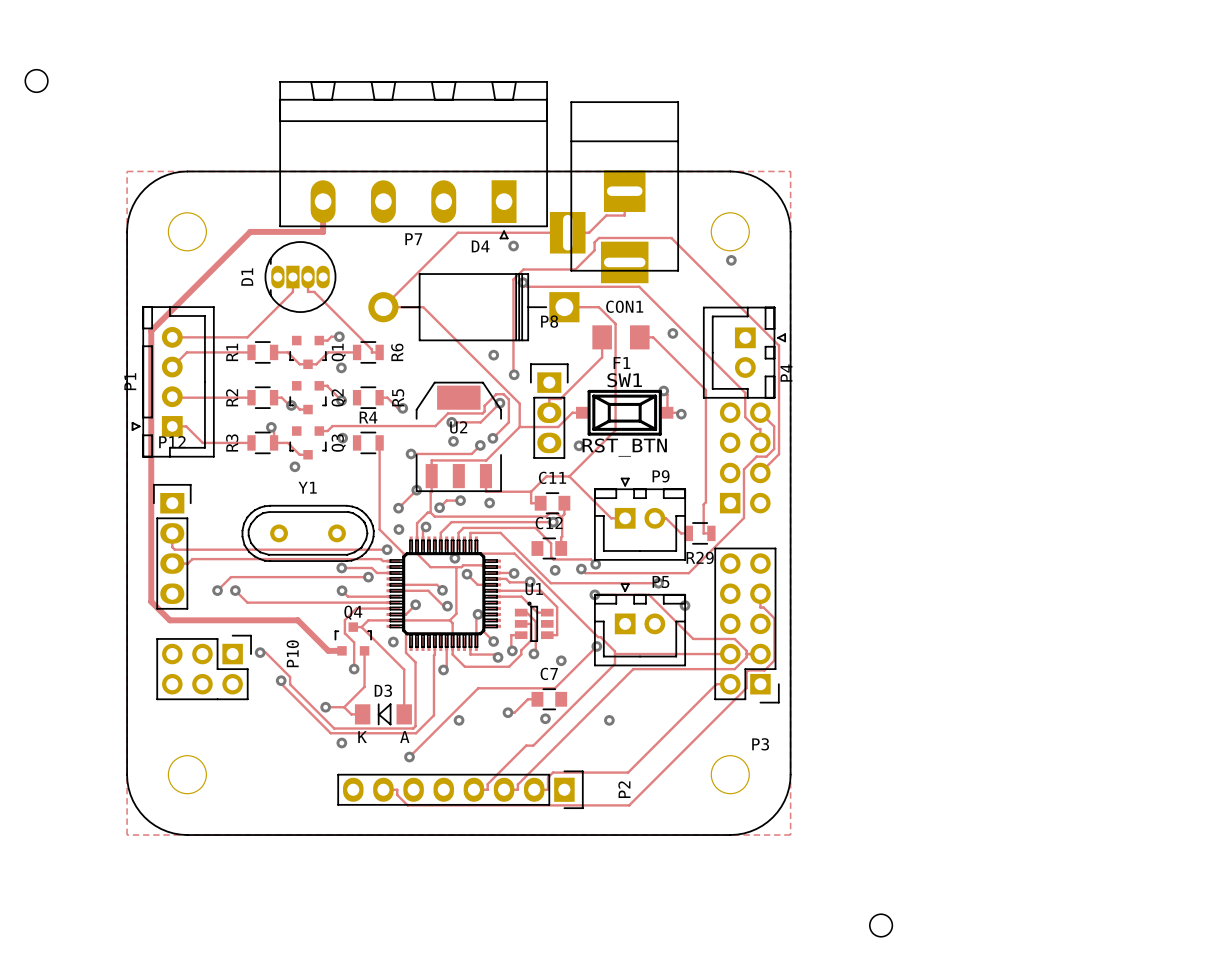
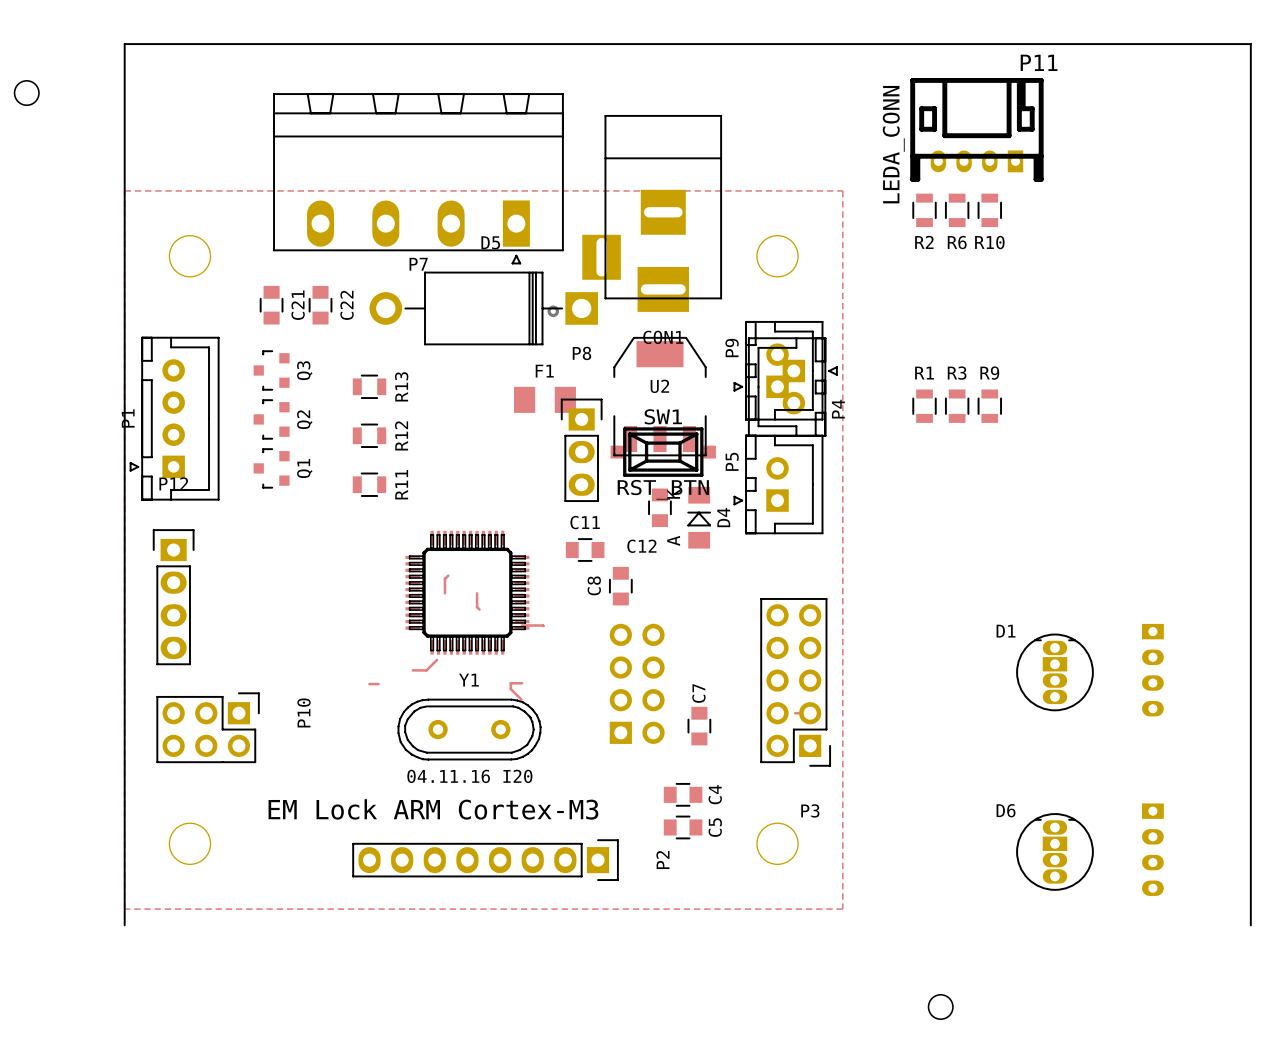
P11: none -> LEDA_CONN (976, 129)
P7 position: (413, 160) -> (418, 178)
R10: none -> (989, 210)
track: (624, 191) (624, 215) (606, 215) (589, 232) (457, 232) (383, 307) (423, 307) (519, 403) (519, 427) -> none
track: (323, 201) (323, 231) (250, 231) (151, 330) (151, 601) (169, 620) (297, 620) (328, 650) (341, 650) -> none
board edge: (127, 231) (130, 211) (140, 194) (149, 184) (161, 177) (180, 171) (730, 171) (750, 174) (767, 184) (777, 194) (784, 205) (789, 218) (790, 231) (790, 774) (787, 794) (781, 806) (772, 817) (756, 829) (743, 833) (730, 835) (180, 834) (167, 831) (155, 825) (140, 812) (130, 794) (127, 774) -> (124, 925) (124, 843)
board edge: none -> (124, 256) (124, 44) (1250, 44) (1250, 925)
D4 name position: D4 (480, 246) -> D4 (723, 517)
via: (513, 246) -> none
via: (731, 260) -> none
D4 footprint: [368, 273, 580, 342] -> [687, 486, 712, 549]
D1 name position: D1 (247, 277) -> D1 (1006, 631)
C21: none -> (271, 305)
track: (292, 277) (292, 291) (247, 337) (172, 337) -> none
D1 rotation: 0° (300, 277) -> 90° clockwise (1054, 672)
D1 position: (300, 277) -> (1054, 672)
track: (308, 277) (308, 291) (314, 291) (371, 349) (371, 352) (379, 352) -> none
C22: none -> (320, 305)
D5: none -> (483, 308)
track: (523, 282) (527, 286) (639, 286) (745, 392) (745, 417) (757, 428) (760, 428) (760, 442) -> none
track: (564, 307) (598, 307) (615, 323) (615, 430) (569, 476) -> none
via: (672, 333) -> none
track: (339, 336) (331, 336) (327, 340) (319, 340) -> none
via: (339, 336) -> none
track: (602, 337) (602, 357) (560, 398) (549, 398) (549, 412) -> none
F1 position: (620, 337) -> (544, 399)
track: (639, 337) (653, 337) (705, 390) (705, 502) (703, 504) (703, 533) (711, 533) -> none
track: (251, 352) (186, 352) (172, 367) -> none
R1 rotation: 0° (262, 352) -> 90° clockwise (924, 406)
R1 position: (262, 352) -> (924, 406)
track: (274, 352) (287, 352) (299, 364) (316, 364) (328, 352) (357, 352) -> none
Q1 rotation: 0° (308, 352) -> 90° clockwise (271, 468)
Q1 position: (308, 352) -> (271, 468)
R13: none -> (369, 386)
R6 rotation: 0° (368, 352) -> 90° clockwise (957, 210)
R6 position: (368, 352) -> (957, 210)
via: (493, 355) -> none
F1 name position: F1 (621, 363) -> F1 (544, 371)
via: (341, 367) -> none
R9: none -> (989, 406)
track: (514, 374) (513, 279) (523, 269) (575, 269) (594, 250) (594, 242) (599, 237) (671, 237) (779, 345) (779, 454) (760, 472) -> none
via: (514, 374) -> none
track: (319, 385) (327, 385) (341, 400) -> none
track: (663, 391) (667, 394) (667, 412) (681, 414) -> none
via: (663, 391) -> none
track: (172, 396) (251, 397) -> none
R2 name position: R2 (232, 397) -> R2 (924, 242)
R2 rotation: 0° (262, 397) -> 90° clockwise (924, 210)
R2 position: (262, 397) -> (924, 210)
track: (274, 397) (281, 397) (289, 405) (295, 405) (299, 409) (308, 409) -> none
Q2 rotation: 0° (308, 397) -> 90° clockwise (271, 419)
Q2 position: (308, 397) -> (271, 419)
R12: none -> (369, 435)
R5: (368, 397) -> none
track: (379, 397) (387, 397) (398, 408) (402, 408) -> none
via: (341, 400) -> none
track: (499, 403) (480, 422) (451, 422) -> none
via: (499, 403) -> none
via: (291, 405) -> none
via: (402, 408) -> none
track: (581, 412) (572, 412) (558, 427) (519, 427) -> none
track: (760, 412) (774, 426) (774, 448) (766, 456) (756, 456) (743, 469) (743, 518) (688, 573) (585, 573) (581, 569) -> none
via: (681, 414) -> none
via: (451, 422) -> none
track: (172, 426) (186, 426) (202, 442) (251, 442) -> none
track: (271, 427) (274, 430) (274, 442) (287, 442) (299, 454) (308, 454) -> none
via: (271, 427) -> none
track: (519, 427) (486, 460) (431, 460) (430, 512) -> none
track: (319, 431) (327, 431) (332, 426) (435, 426) (448, 413) (482, 413) (484, 405) (496, 394) (503, 394) (508, 399) (508, 422) (492, 438) -> none
U2 position: (458, 436) -> (660, 396)
via: (342, 438) -> none
via: (492, 438) -> none
via: (453, 441) -> none
R3 rotation: 0° (262, 442) -> 90° clockwise (957, 406)
R3 position: (262, 442) -> (957, 406)
Q3 rotation: 0° (308, 442) -> 90° clockwise (271, 370)
Q3 position: (308, 442) -> (271, 370)
R11: none -> (369, 484)
R4: (368, 442) -> none
track: (379, 442) (379, 529) (403, 553) (403, 584) -> none
track: (480, 445) (471, 453) (411, 453) -> none
via: (480, 445) -> none
via: (579, 445) -> none
via: (411, 453) -> none
part position: (745, 457) -> (637, 683)
via: (294, 466) -> none
track: (485, 476) (485, 491) (531, 491) -> none
track: (569, 476) (611, 518) (625, 518) -> none
track: (569, 476) (546, 476) (531, 491) -> none
track: (416, 490) (398, 508) -> none
via: (416, 490) -> none
track: (531, 491) (531, 503) (540, 503) -> none
track: (460, 500) (446, 500) (439, 507) -> none
via: (460, 500) -> none
via: (489, 502) -> none
track: (564, 503) (564, 514) (561, 517) -> none
via: (439, 507) -> none
via: (398, 508) -> none
track: (430, 512) (427, 512) (417, 523) (417, 553) (430, 567) (461, 567) (463, 565) (494, 567) -> none
track: (430, 512) (434, 516) (546, 516) (549, 513) (556, 513) (562, 518) (561, 548) -> none
track: (654, 518) (666, 518) (681, 533) (688, 533) -> none
P9 rotation: 0° (640, 519) -> 90° counterclockwise (778, 370)
P9 position: (640, 519) -> (778, 370)
track: (553, 522) (451, 522) (440, 532) (440, 543) -> none
via: (553, 522) -> none
C12 name position: C12 (549, 523) -> C12 (641, 546)
via: (426, 526) -> none
via: (398, 529) -> none
track: (172, 533) (172, 547) (174, 549) (387, 549) -> none
Y1 position: (308, 533) -> (469, 729)
R29: (700, 533) -> none
C8: none -> (620, 586)
track: (458, 543) (458, 532) (463, 527) (535, 527) (551, 543) (551, 557) (553, 559) (590, 559) (595, 564) -> none
track: (464, 543) (464, 553) (514, 553) (598, 637) (600, 637) (614, 651) (614, 663) (533, 745) (526, 745) (487, 784) (487, 789) (473, 789) -> none
track: (470, 543) (470, 532) (500, 532) (550, 583) (658, 583) -> none
C12 rotation: 0° (549, 548) -> 90° clockwise (659, 507)
C12 position: (549, 548) -> (659, 507)
via: (387, 549) -> none
via: (454, 558) -> none
track: (393, 561) (382, 561) (380, 559) (192, 559) (187, 563) (172, 563) -> none
via: (595, 564) -> none
track: (456, 567) (456, 613) (449, 620) -> none
track: (341, 568) (371, 568) (376, 572) (393, 572) -> none
via: (341, 568) -> none
via: (581, 569) -> none
via: (555, 570) -> none
via: (514, 573) -> none
track: (467, 574) (477, 584) (494, 584) -> none
via: (467, 574) -> none
track: (368, 577) (231, 577) (217, 590) -> none
via: (368, 577) -> none
track: (494, 578) (506, 578) (509, 582) (530, 581) -> none
via: (530, 581) -> none
via: (658, 583) -> none
track: (393, 584) (437, 584) (442, 590) -> none
via: (217, 590) -> none
track: (235, 590) (247, 602) (393, 602) -> none
via: (235, 590) -> none
track: (342, 590) (347, 596) (393, 596) -> none
via: (342, 590) -> none
track: (393, 590) (428, 590) (443, 606) (447, 606) -> none
via: (442, 590) -> none
track: (494, 590) (540, 590) (557, 607) (557, 635) (547, 635) -> none
part position: (443, 593) -> (467, 592)
track: (760, 593) (760, 607) (763, 607) (774, 618) (774, 660) (764, 670) (748, 670) (746, 672) (746, 687) (629, 805) (407, 805) (397, 794) (397, 789) (383, 789) -> none
track: (594, 594) (649, 594) (693, 638) (734, 638) (746, 650) (746, 657) (734, 669) (633, 669) (517, 784) (517, 789) (504, 789) -> none
via: (594, 594) -> none
track: (494, 596) (521, 596) (537, 612) (547, 612) -> none
via: (415, 604) -> none
via: (685, 605) -> none
via: (447, 606) -> none
track: (393, 608) (356, 608) (344, 620) (344, 633) (354, 642) (354, 669) -> none
track: (521, 612) (526, 612) (535, 621) (535, 652) (533, 653) -> none
track: (478, 614) (476, 616) (476, 644) -> none
via: (478, 614) -> none
part: none -> (1152, 670)
track: (449, 620) (368, 620) (361, 627) (404, 669) (404, 714) -> none
track: (449, 620) (452, 623) (452, 654) (464, 666) (509, 666) (521, 654) (521, 650) (531, 640) (531, 623) (521, 623) -> none
U1: (534, 621) -> none
P5 rotation: 0° (640, 624) -> 90° counterclockwise (778, 484)
P5 position: (640, 624) -> (778, 484)
track: (521, 635) (511, 635) (512, 650) -> none
Q4: (353, 638) -> none
via: (493, 641) -> none
via: (393, 642) -> none
track: (434, 644) (433, 715) (416, 733) (330, 733) (281, 683) (281, 680) -> none
track: (440, 644) (440, 633) (407, 633) (405, 635) (405, 652) (415, 662) (415, 726) (413, 728) (334, 728) (290, 684) (290, 677) (265, 652) (260, 652) -> none
track: (446, 644) (446, 666) (443, 669) -> none
track: (470, 644) (470, 654) (495, 654) (498, 657) -> none
track: (596, 646) (554, 688) (478, 688) (409, 757) -> none
via: (596, 646) -> none
track: (364, 650) (364, 686) (344, 707) -> none
via: (512, 650) -> none
via: (260, 652) -> none
via: (533, 653) -> none
track: (614, 654) (730, 654) -> none
via: (498, 657) -> none
via: (561, 660) -> none
via: (354, 669) -> none
via: (443, 669) -> none
via: (281, 680) -> none
track: (730, 684) (716, 684) (628, 772) (553, 772) (548, 777) (548, 789) (534, 789) -> none
track: (537, 699) (527, 699) (514, 712) (507, 712) -> none
C7 rotation: 0° (549, 699) -> 90° clockwise (699, 726)
C7 position: (549, 699) -> (699, 726)
track: (325, 707) (344, 707) -> none
via: (325, 707) -> none
track: (344, 707) (351, 714) (362, 714) -> none
text: none -> 04.11.16 I20 (469, 776)
via: (507, 712) -> none
D3: (383, 714) -> none
via: (545, 718) -> none
via: (459, 720) -> none
via: (609, 720) -> none
C4: none -> (683, 794)
text: none -> EM Lock ARM Cortex-M3 (433, 809)
via: (341, 743) -> none
via: (409, 757) -> none
C5: none -> (683, 827)
part: none -> (1152, 849)
D6: none -> (1054, 851)

